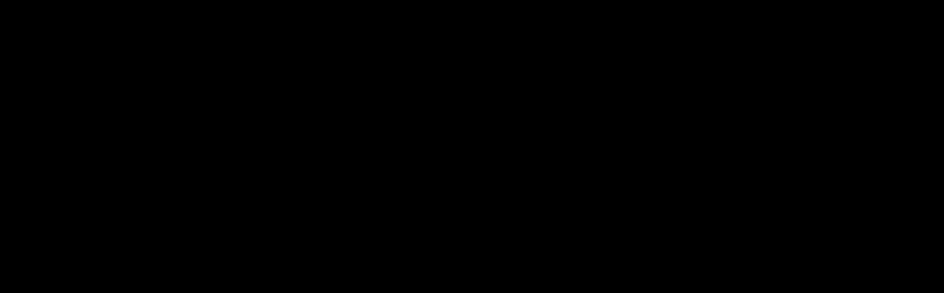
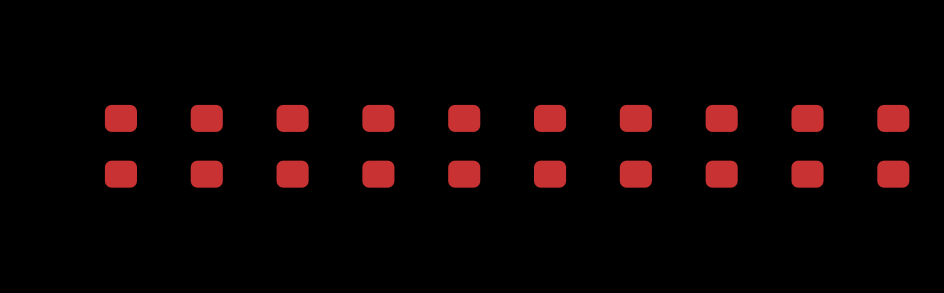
part: none -> (120, 146)
part: none -> (206, 146)
part: none -> (292, 146)
part: none -> (378, 146)
part: none -> (464, 146)
part: none -> (550, 146)
part: none -> (635, 146)
part: none -> (721, 146)
part: none -> (807, 146)
part: none -> (893, 146)

